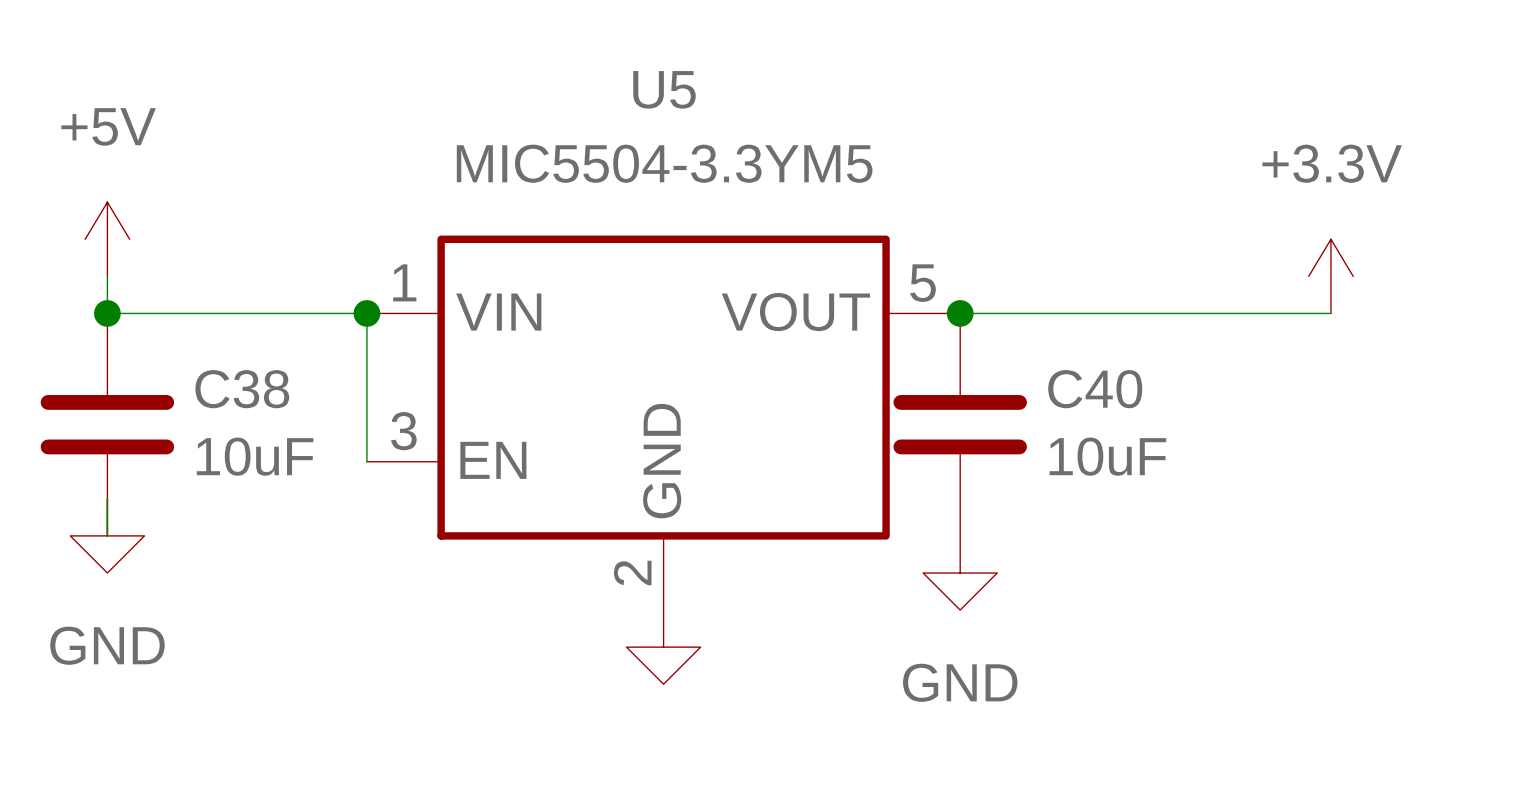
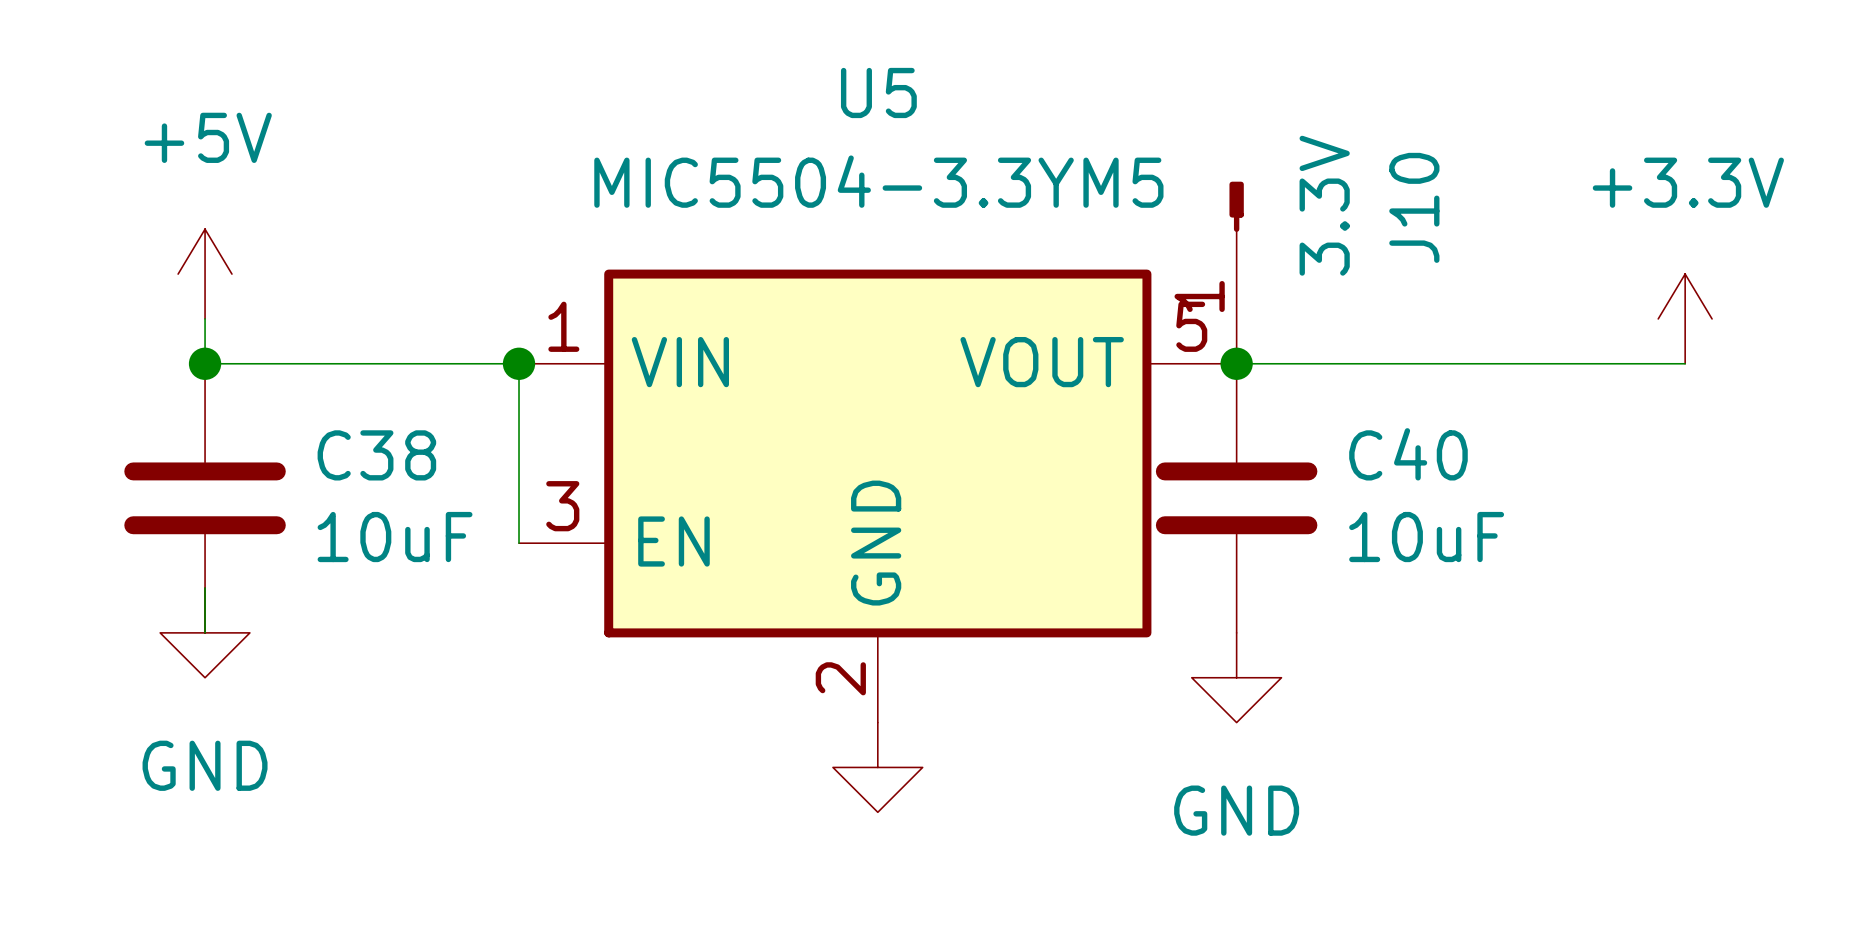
J10: none -> 3.3V (1236, 272)

